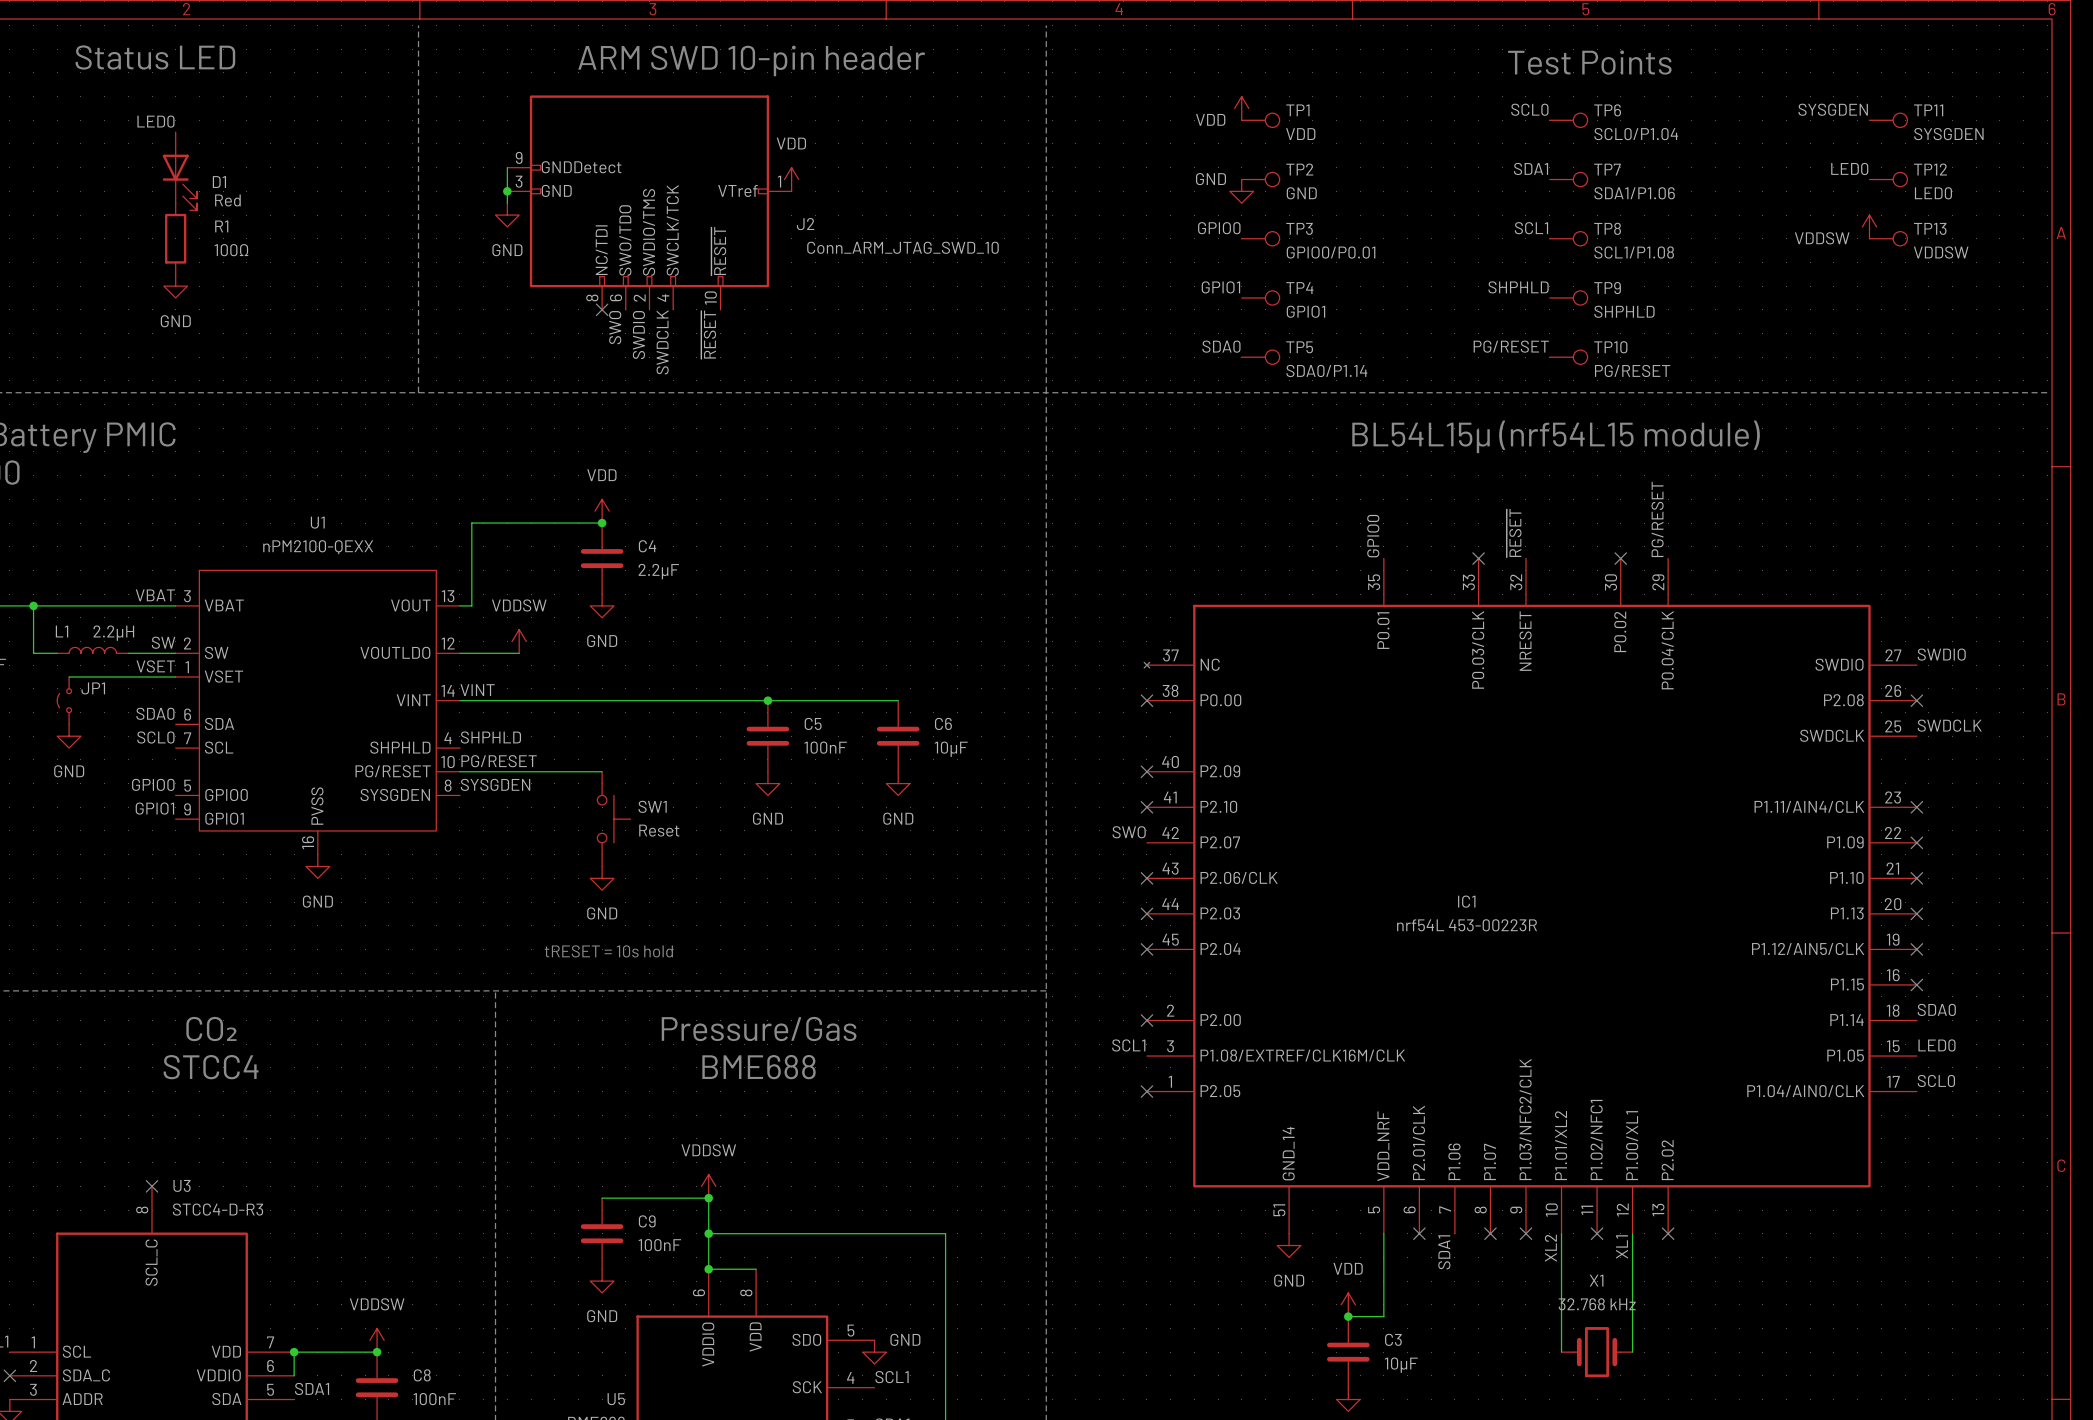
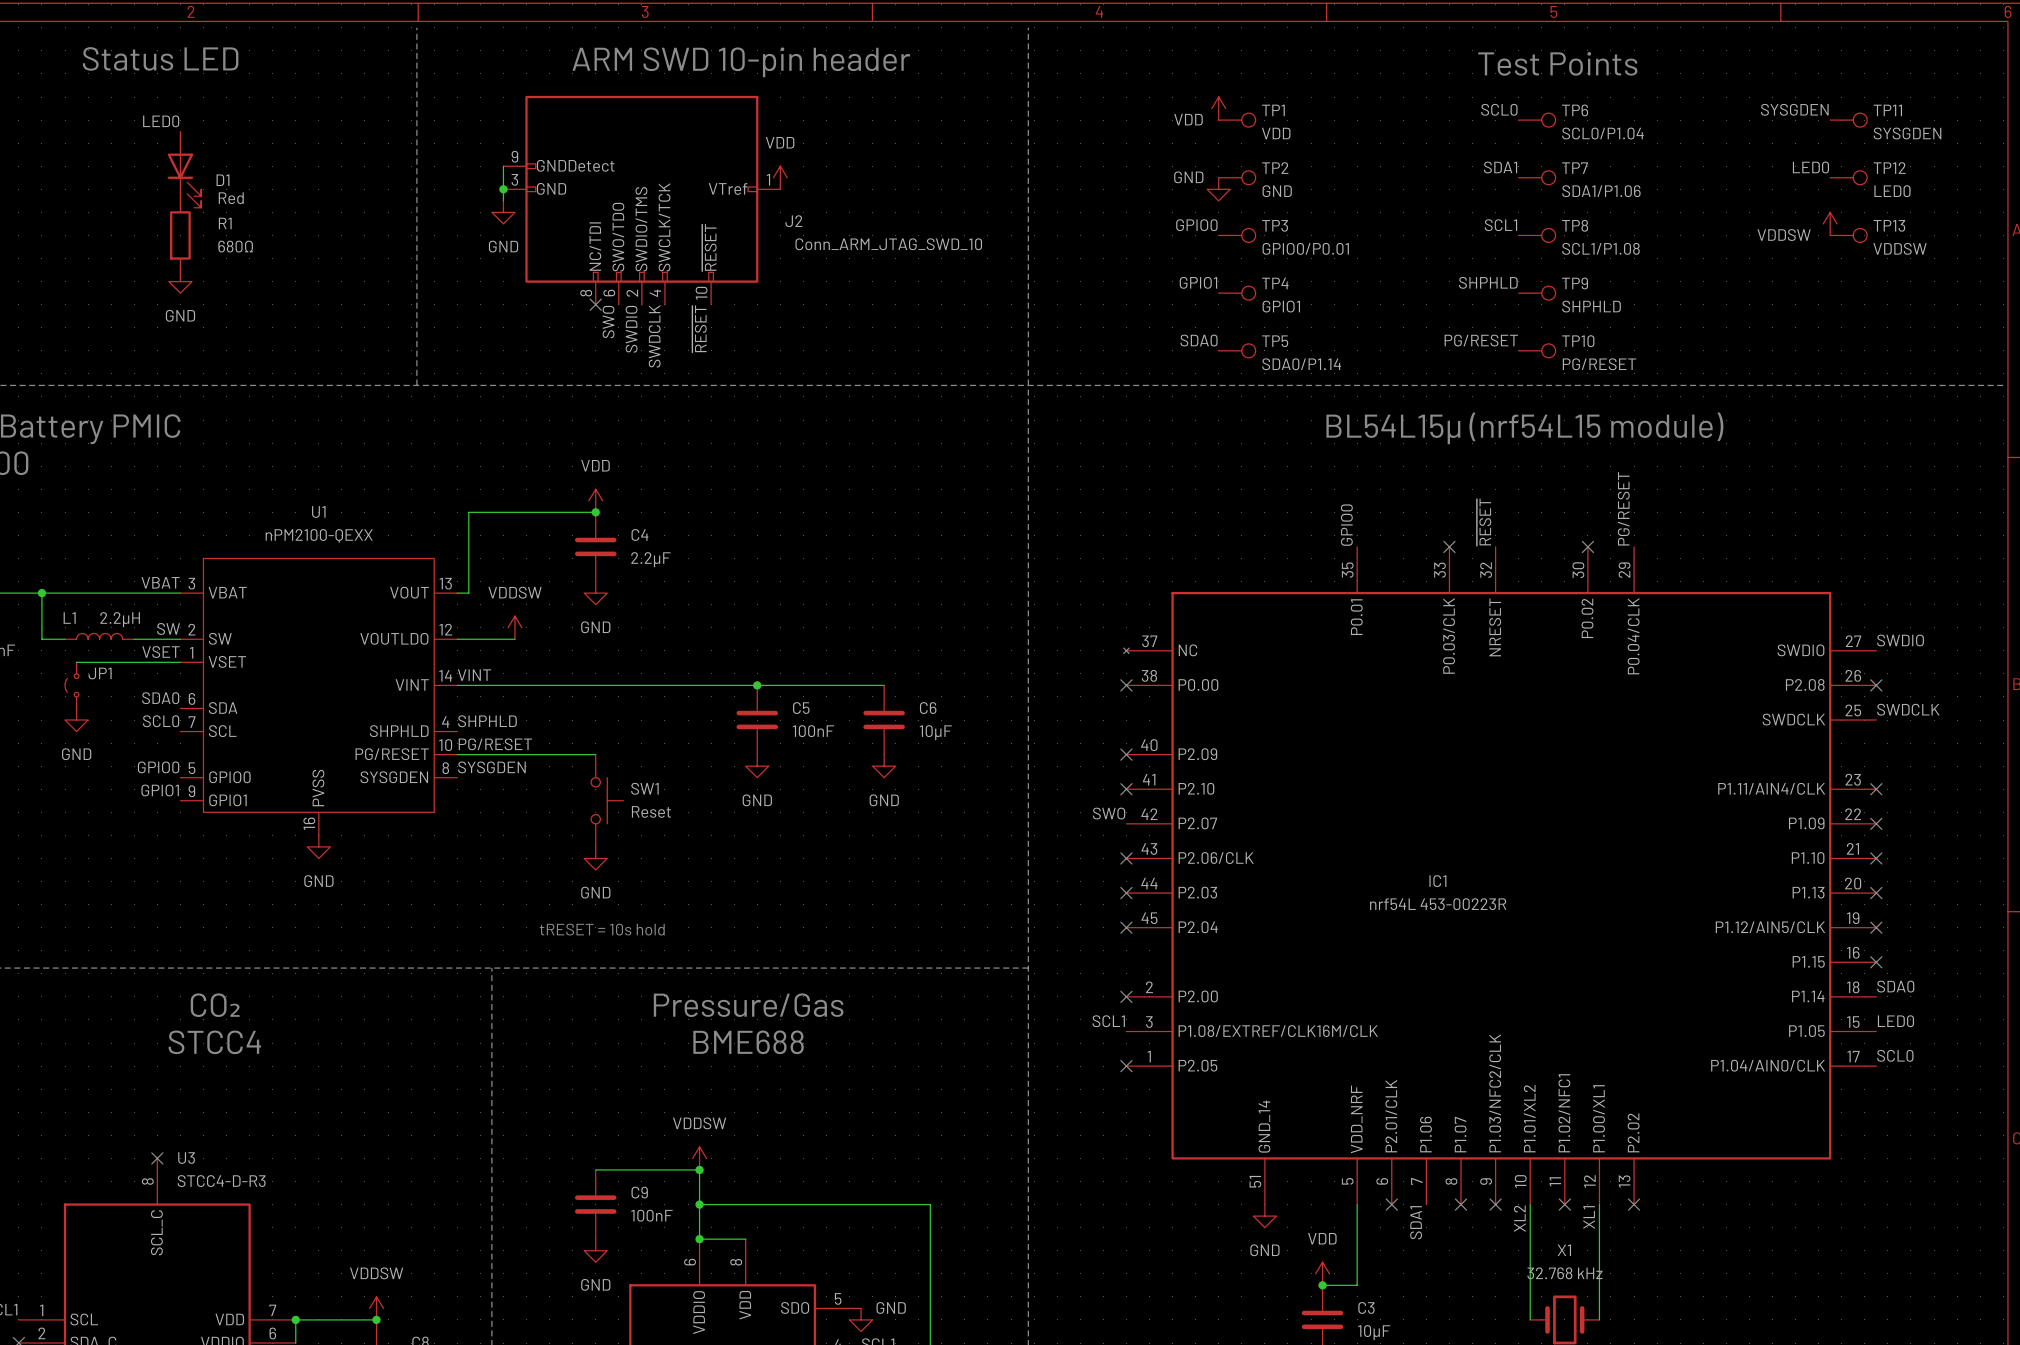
R1 value: 100Ω (231, 250) -> 680Ω (235, 246)

